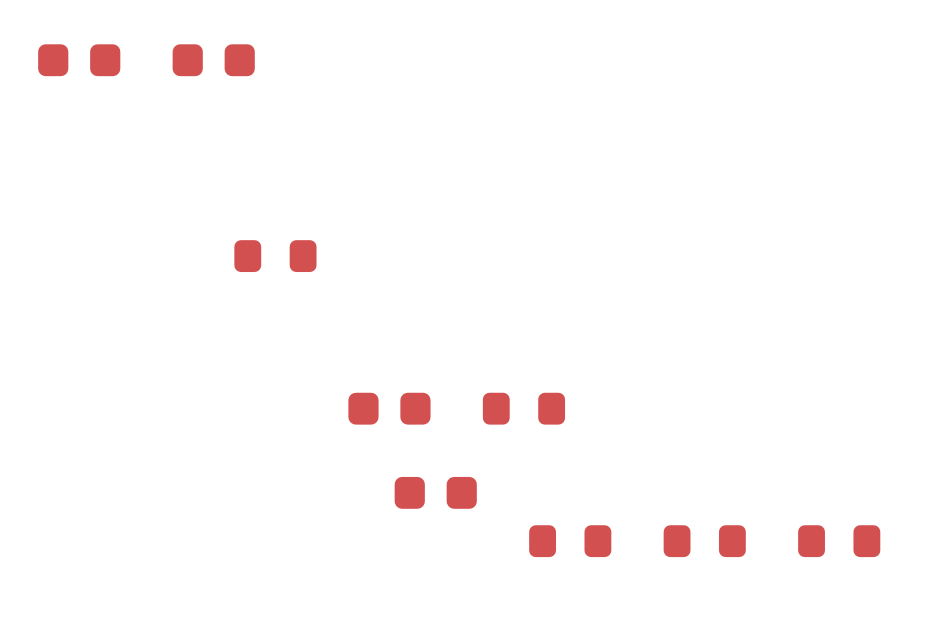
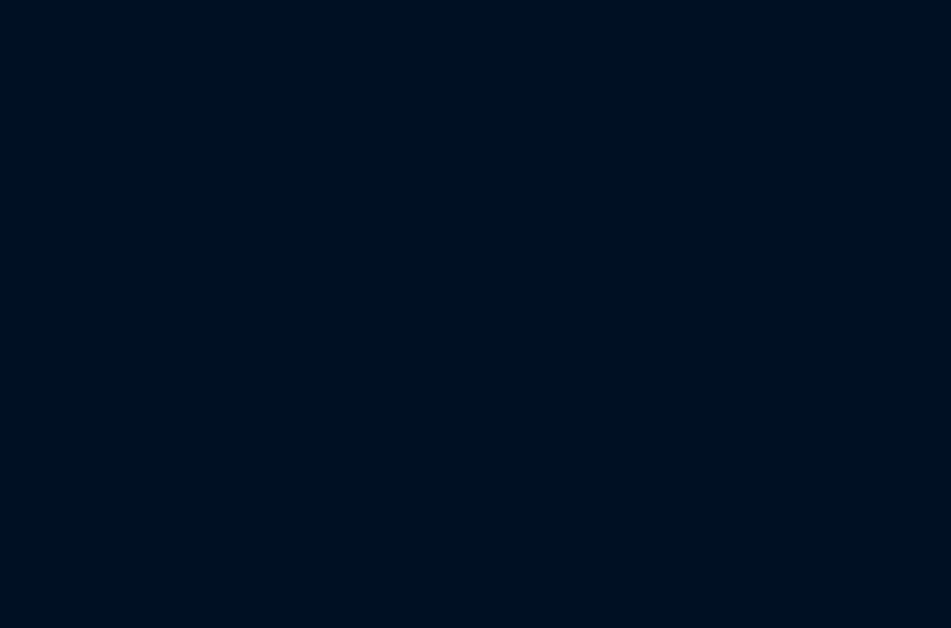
part: (79, 60) -> none
part: (213, 60) -> none
part: (275, 256) -> none
part: (389, 408) -> none
part: (523, 408) -> none
part: (435, 492) -> none
part: (570, 541) -> none
part: (704, 541) -> none
part: (839, 541) -> none

